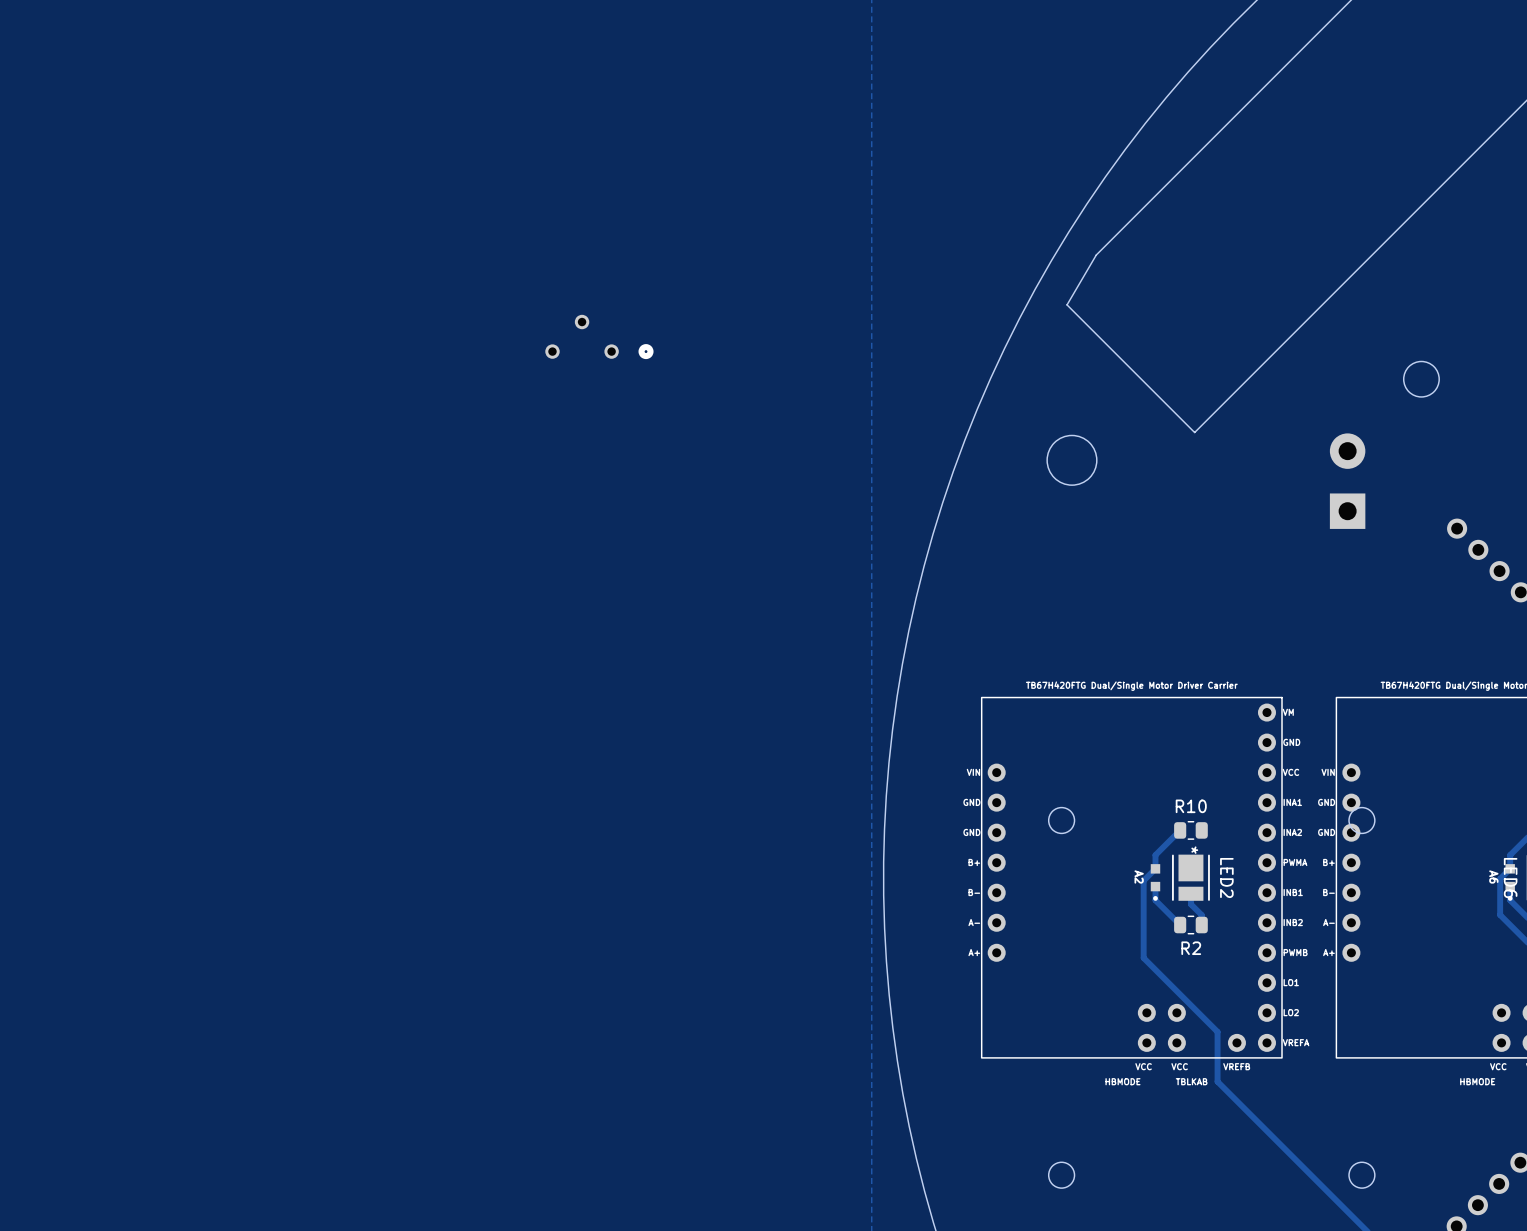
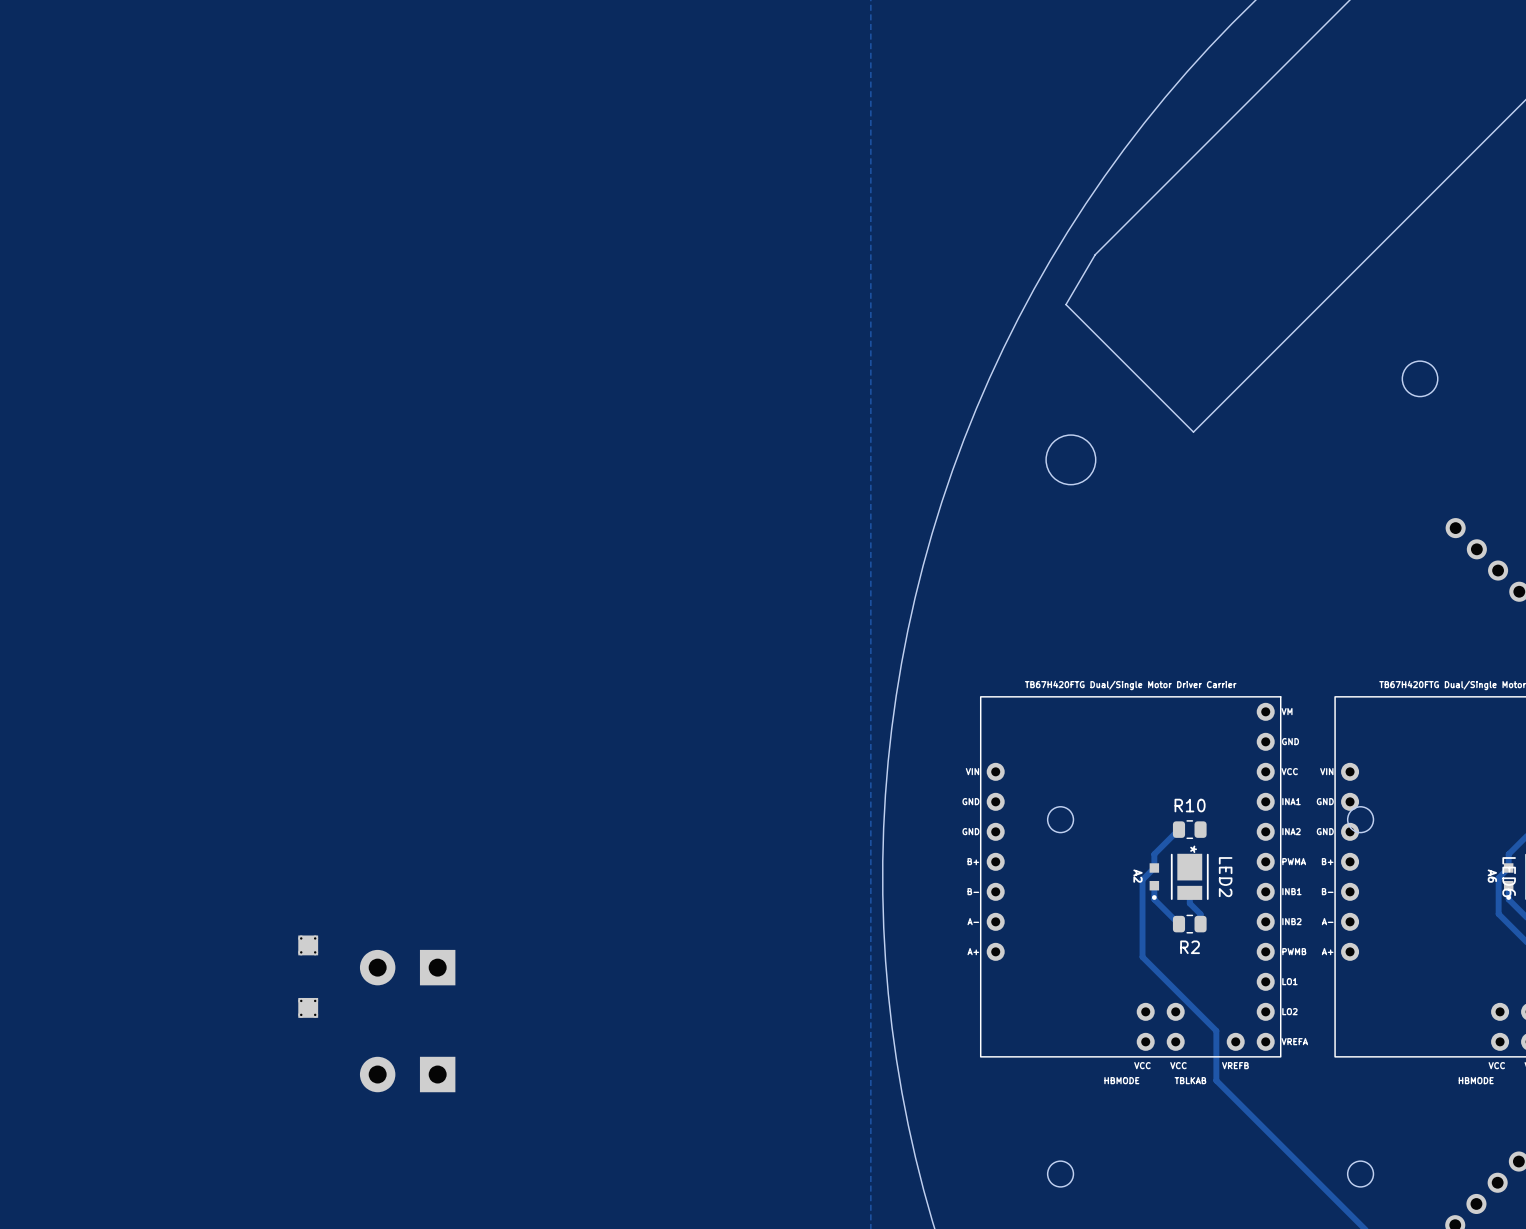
part: (599, 336) -> none
part: (1347, 481) -> none
part: none -> (308, 945)
part: none -> (407, 967)
part: none -> (308, 1007)
part: none -> (407, 1074)

